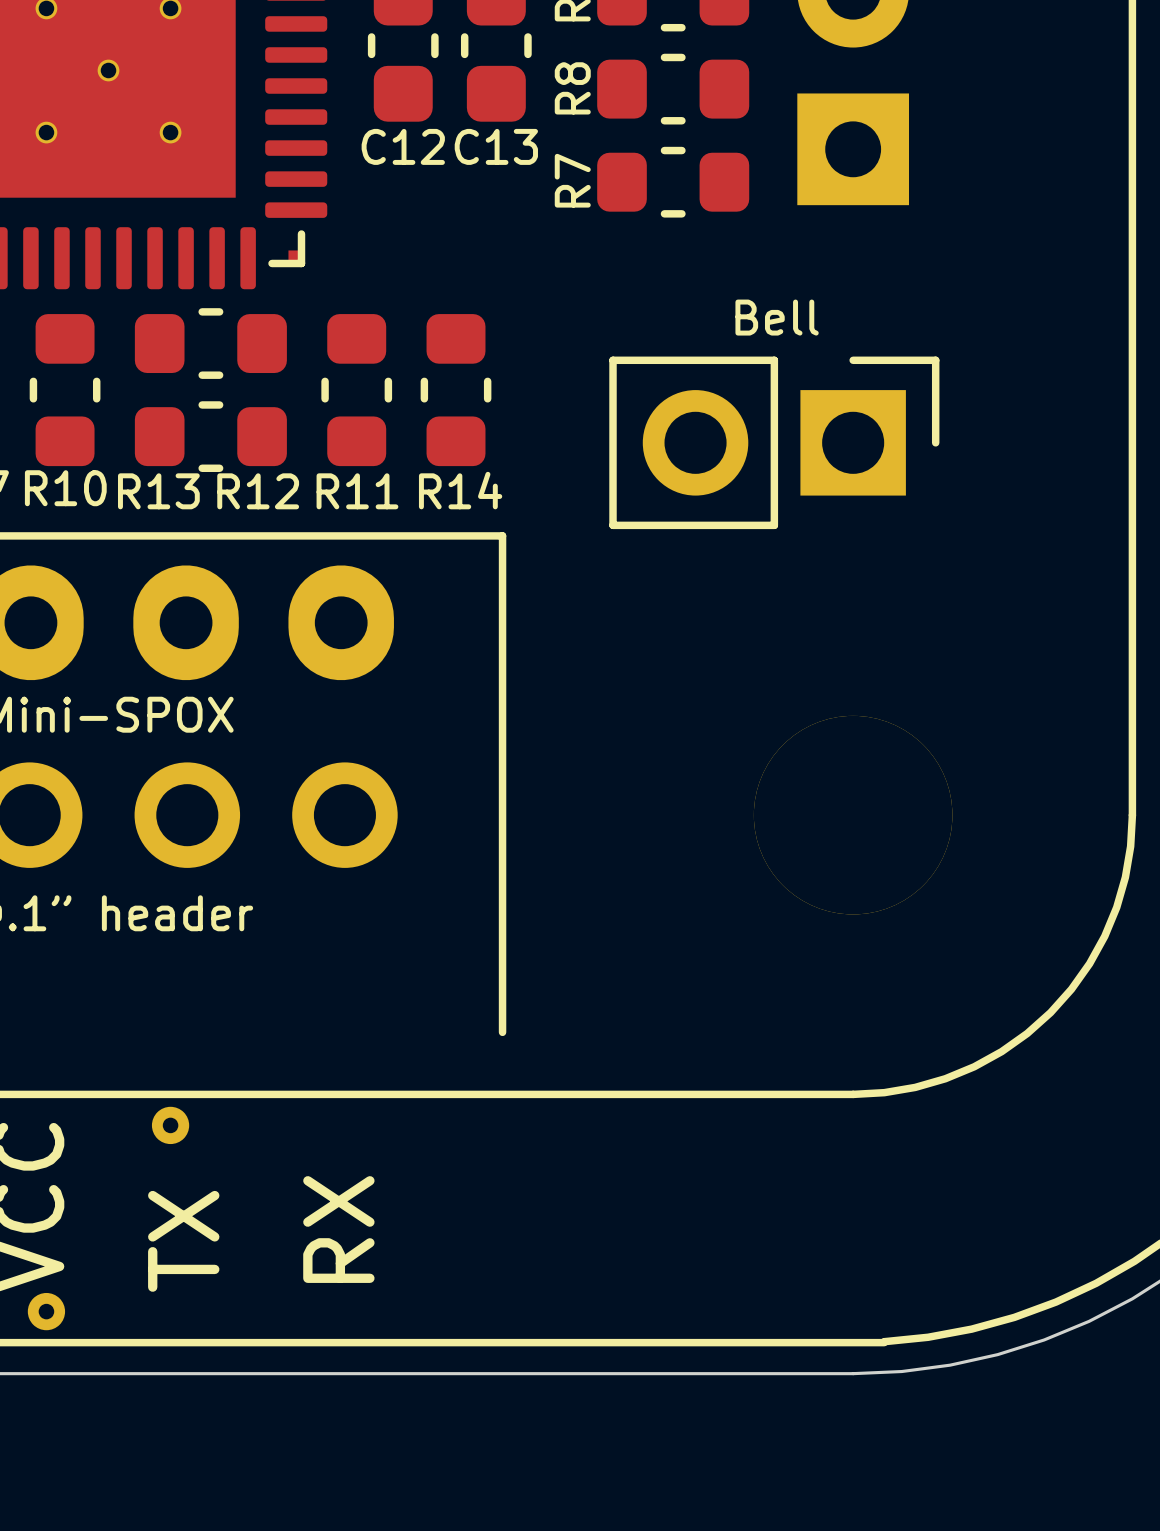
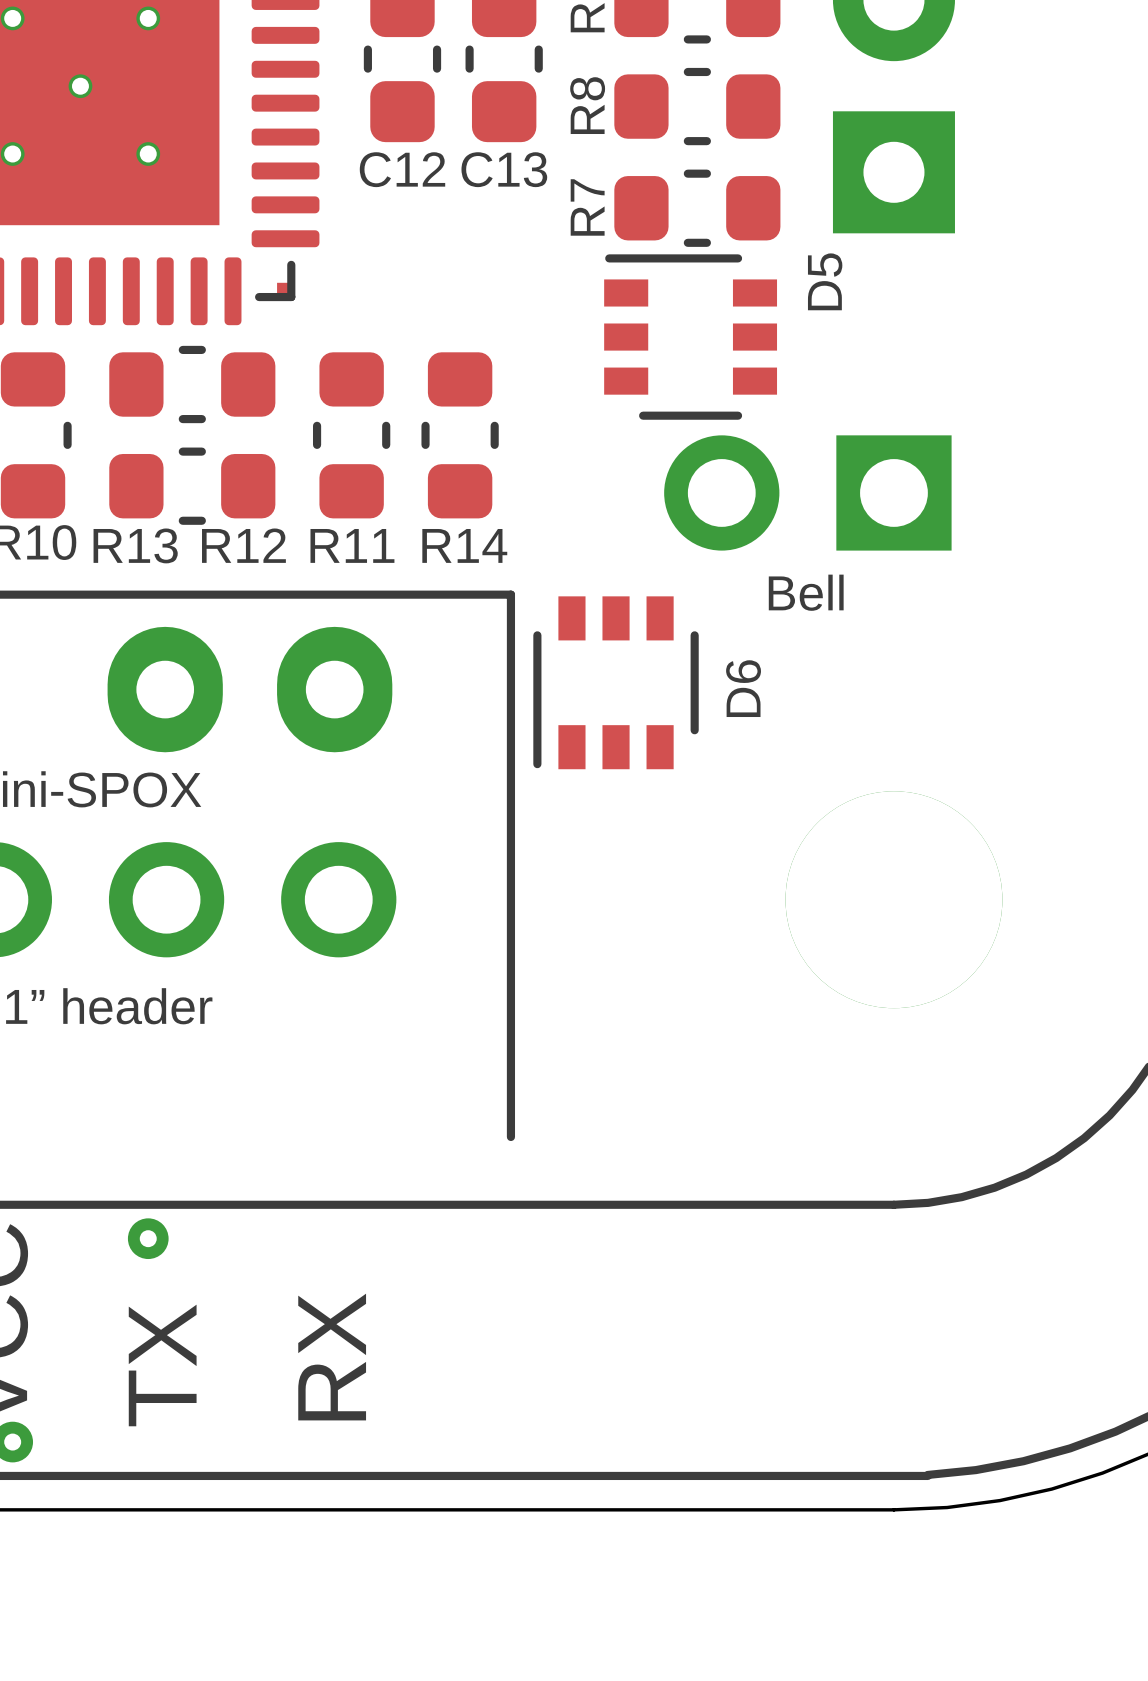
D5: none -> (690, 337)
text position: Bell (777, 317) -> Bell (806, 592)
part side: top (774, 442) -> bottom (807, 492)
D6: none -> (616, 682)

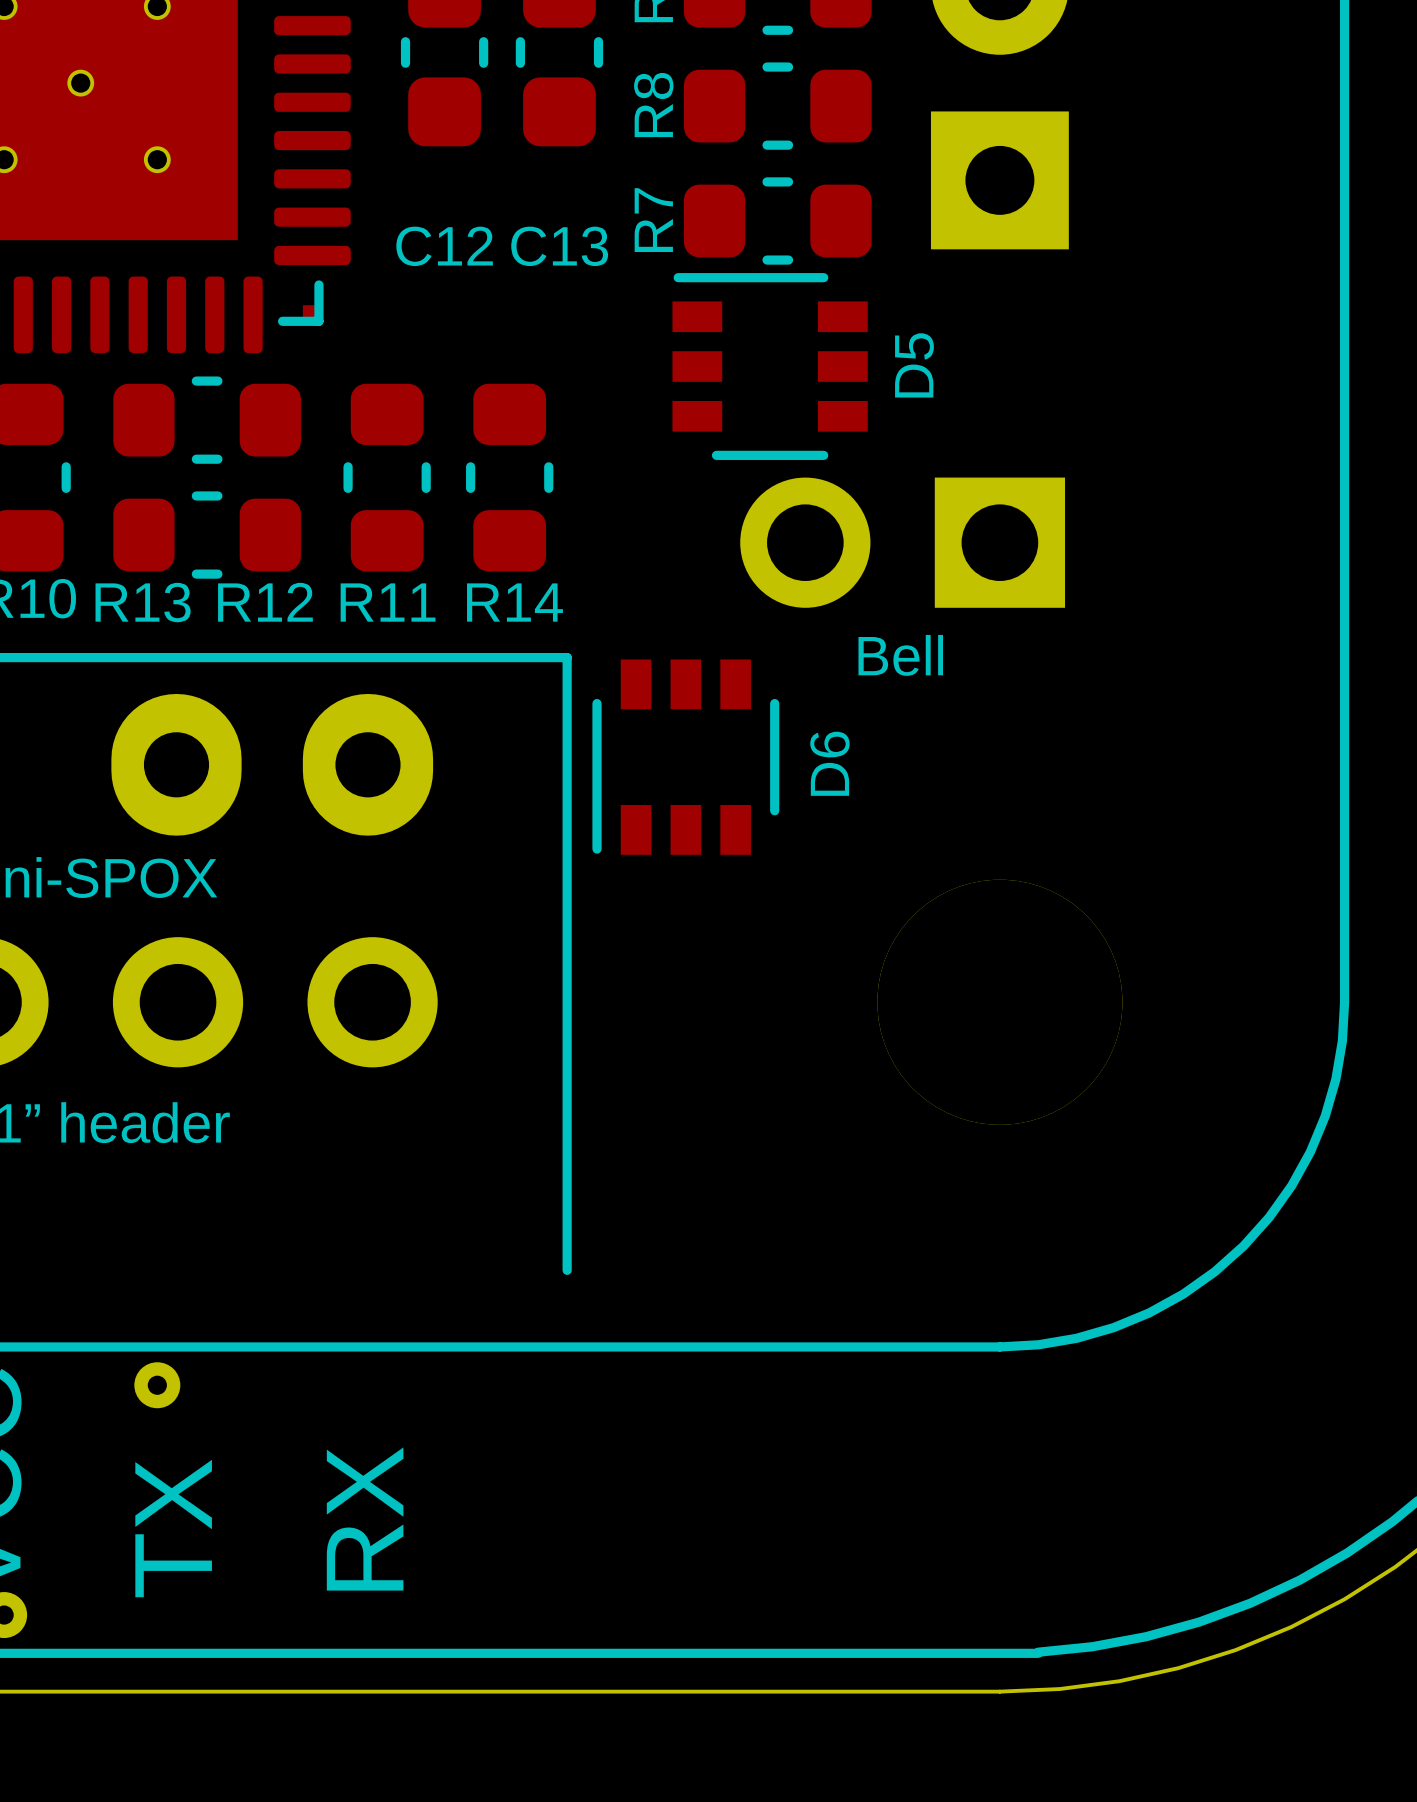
C12 name position: C12 (402, 169) -> C12 (444, 246)
C13 name position: C13 (504, 169) -> C13 (559, 246)
D5 name position: D5 (825, 281) -> D5 (914, 365)

